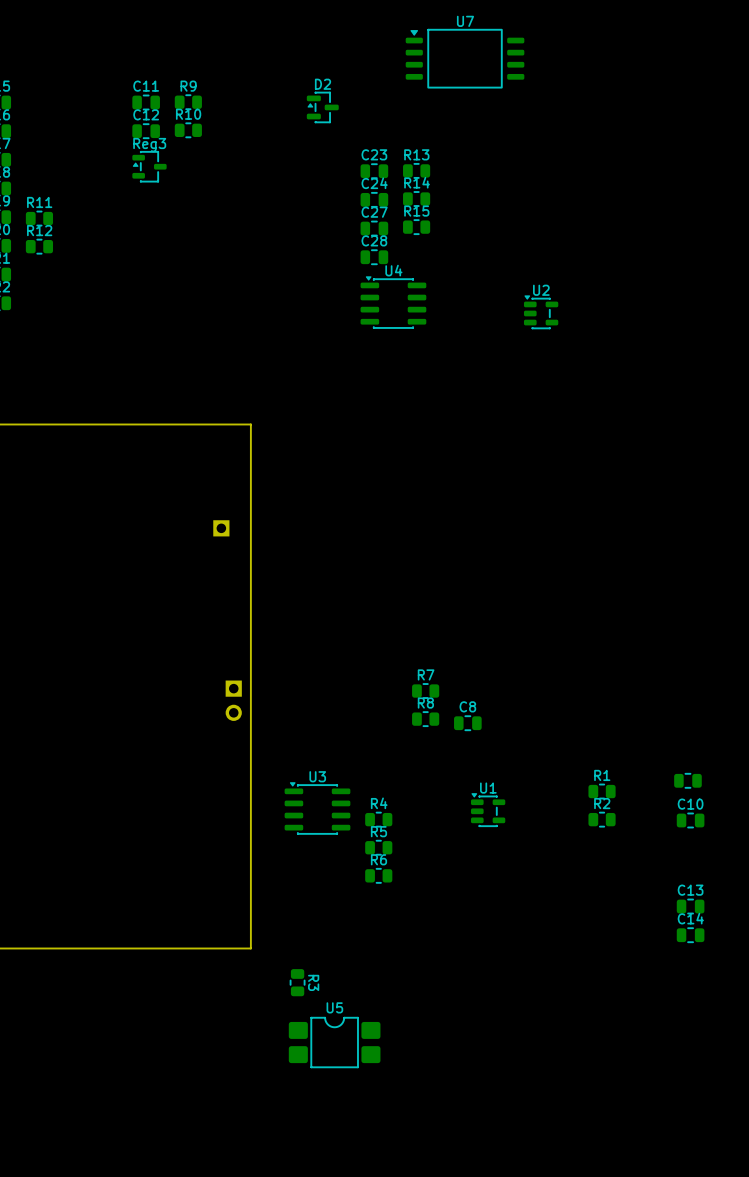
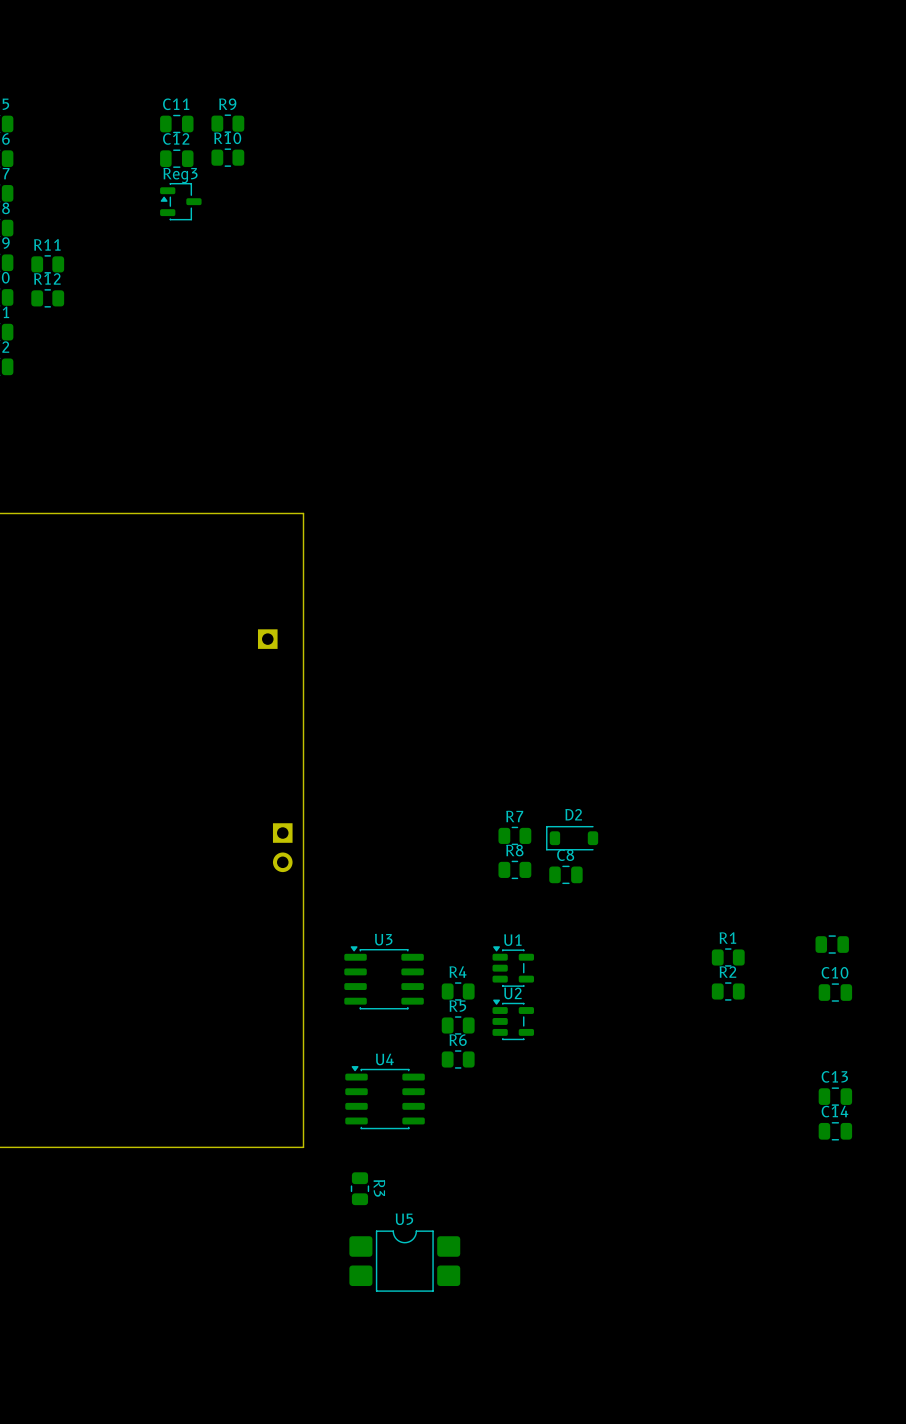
U7: (465, 58) -> none
D2 footprint: [306, 92, 339, 123] -> [546, 825, 599, 851]
R13: (416, 170) -> none
C23: (374, 171) -> none
C24: (374, 199) -> none
R14: (416, 199) -> none
R15: (416, 227) -> none
C27: (374, 228) -> none
C28: (374, 257) -> none
U4 position: (393, 302) -> (385, 1097)
U2 position: (541, 312) -> (513, 1019)
U1 position: (488, 809) -> (513, 966)

